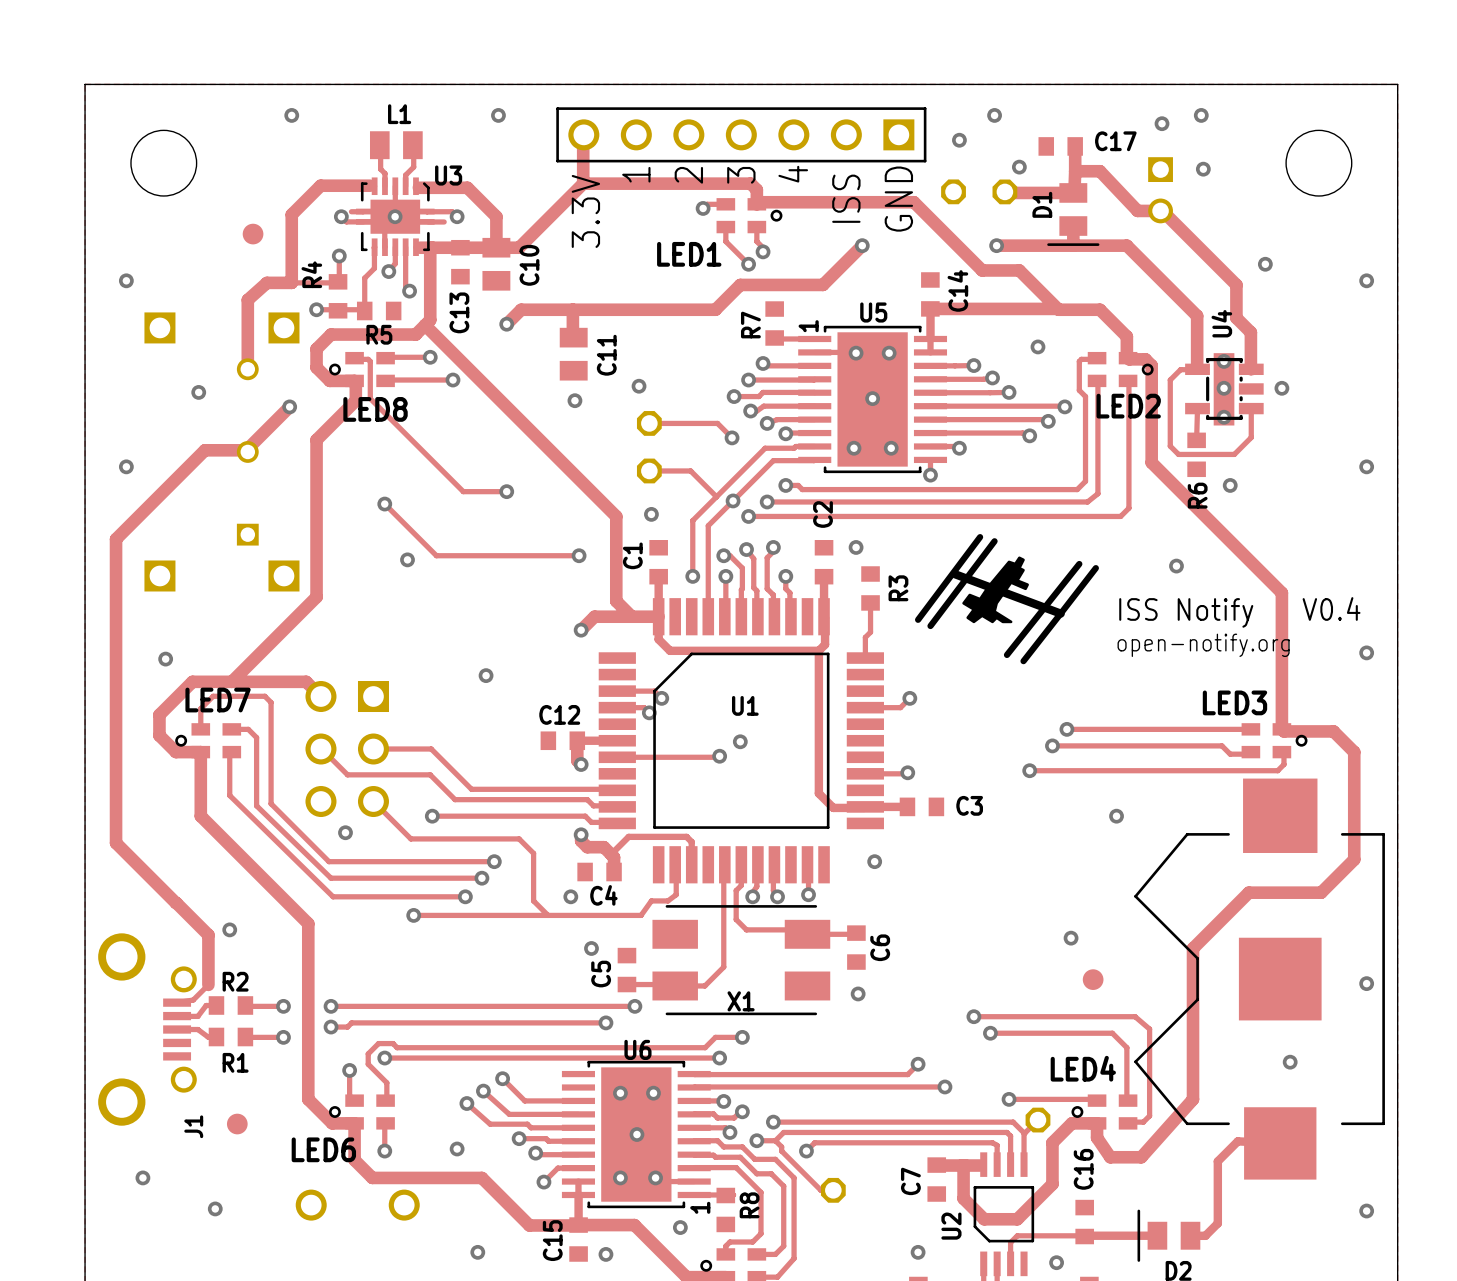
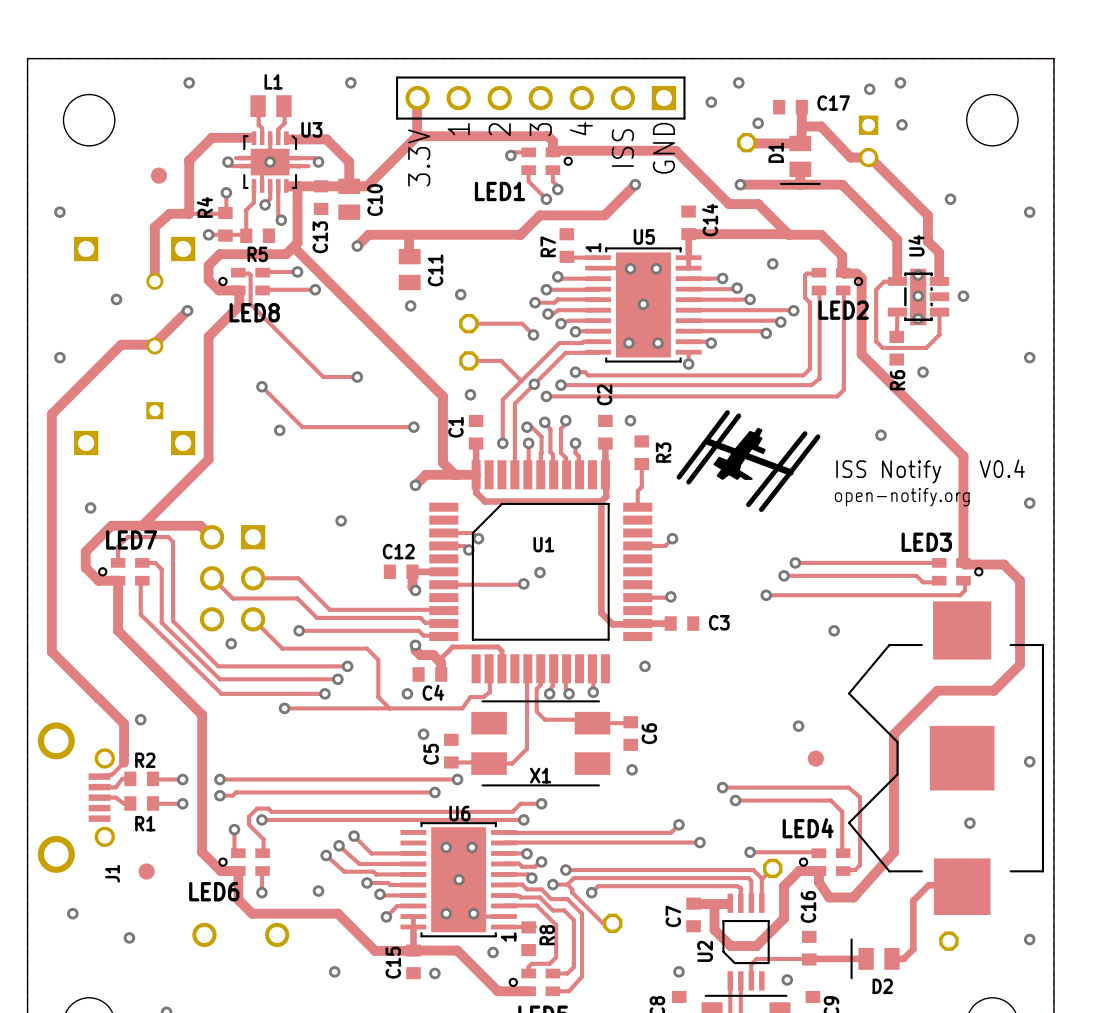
part: (953, 191) -> none
part: none -> (948, 941)

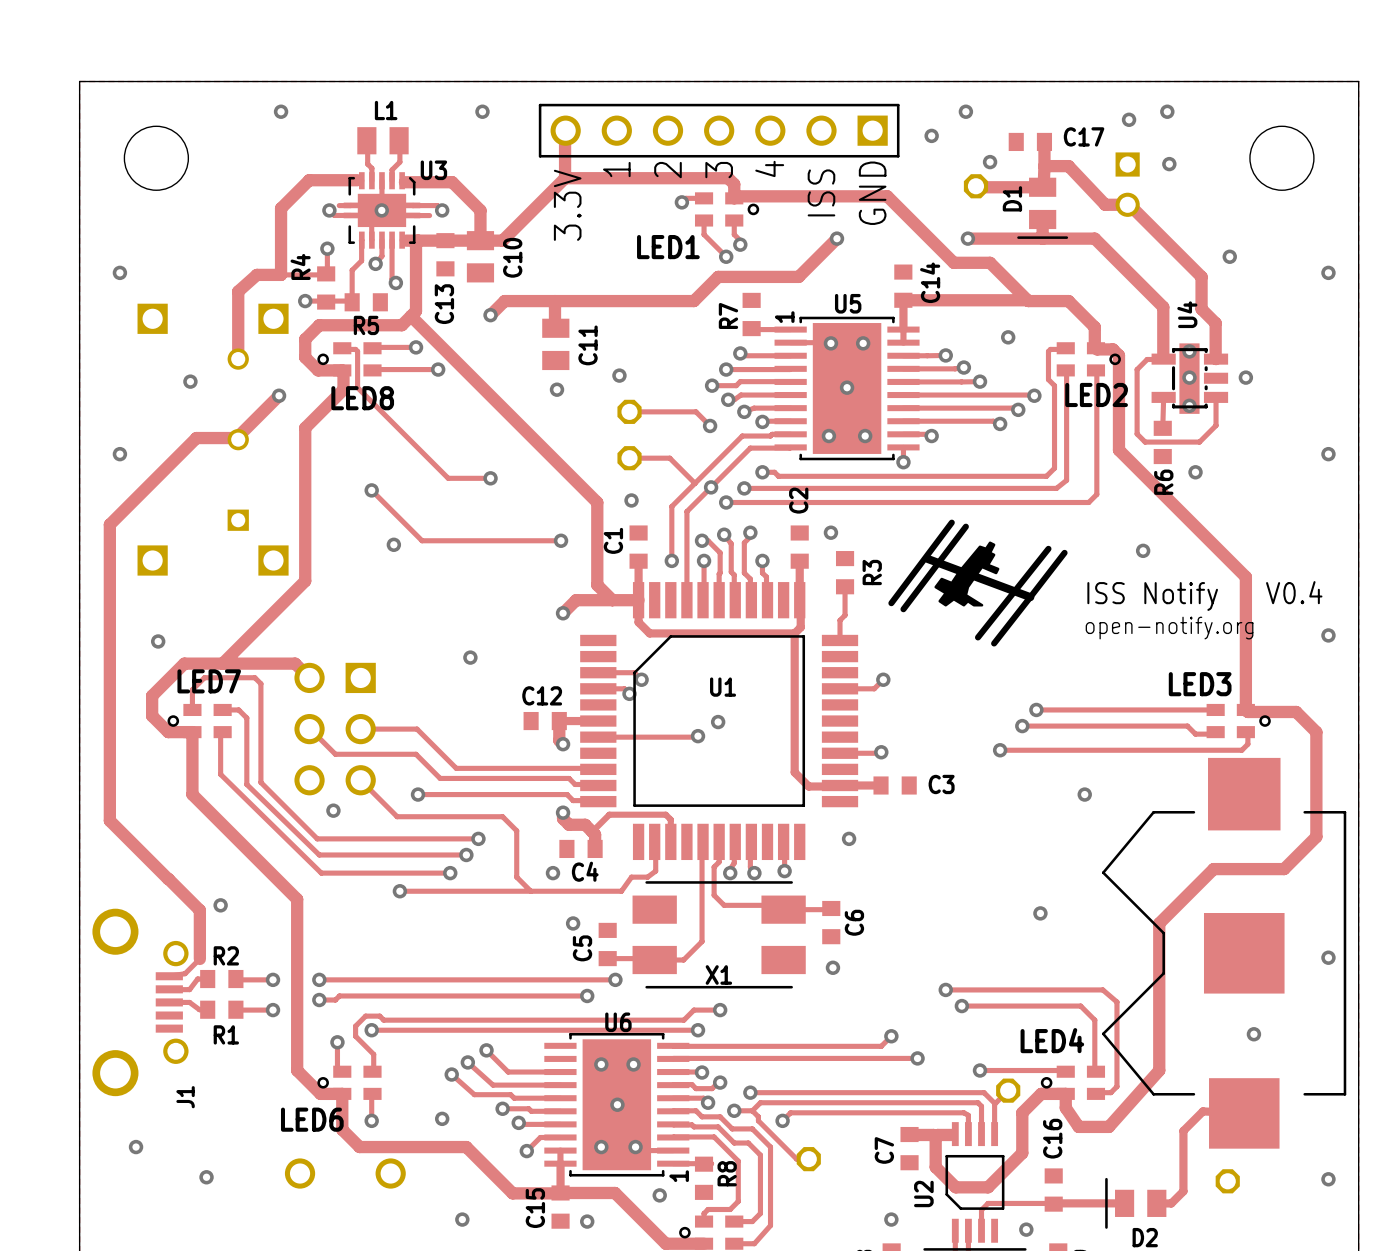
part: (158, 175) -> none
part: (815, 758) -> none
part: (146, 871) -> none

